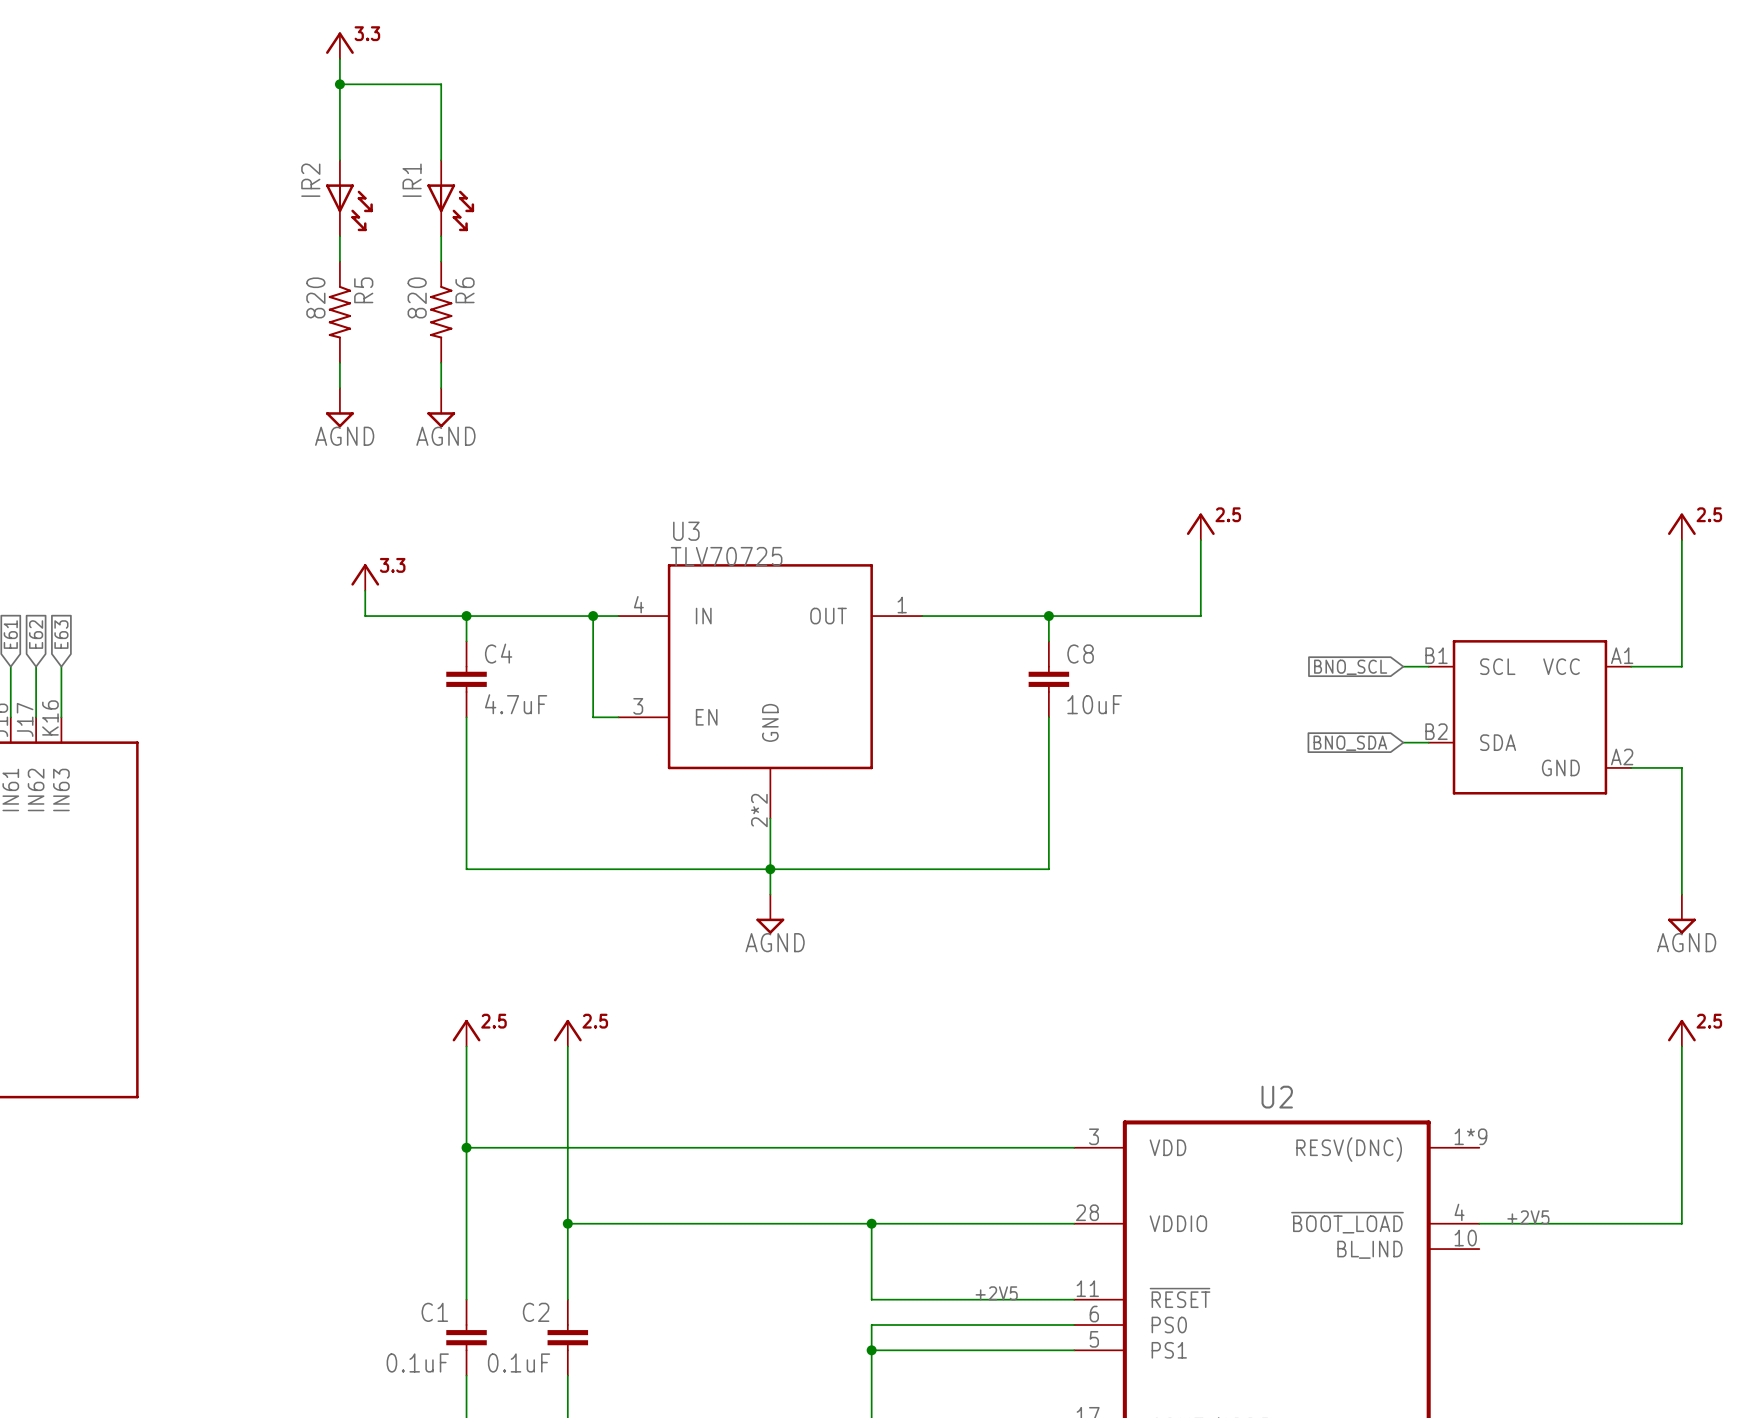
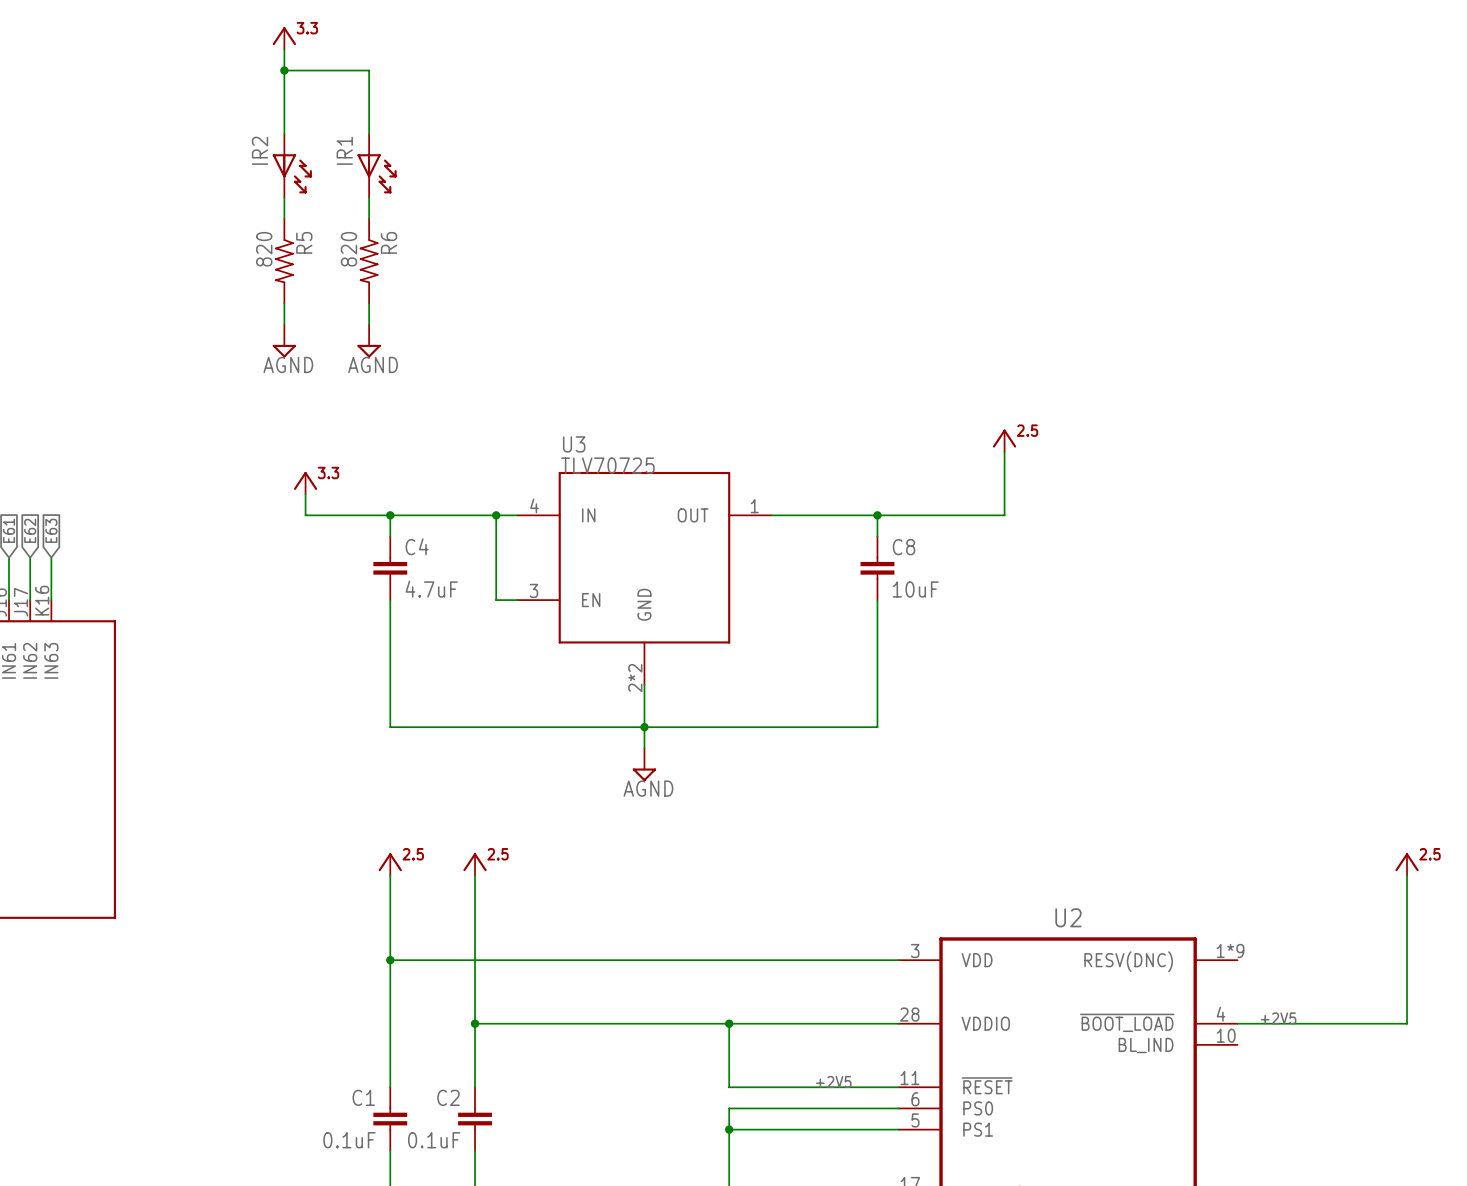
power symbol: (1681, 526) -> none
wire: (1681, 540) (1681, 666) (1631, 666) -> none
wire: (1403, 666) (1428, 666) -> none
global label: BNO_SCL (1350, 667) -> none
part: (1529, 717) -> none
wire: (1403, 742) (1428, 742) -> none
global label: BNO_SDA (1350, 743) -> none
wire: (1631, 767) (1681, 767) (1681, 894) -> none
power symbol: AGND (1681, 914) -> none

